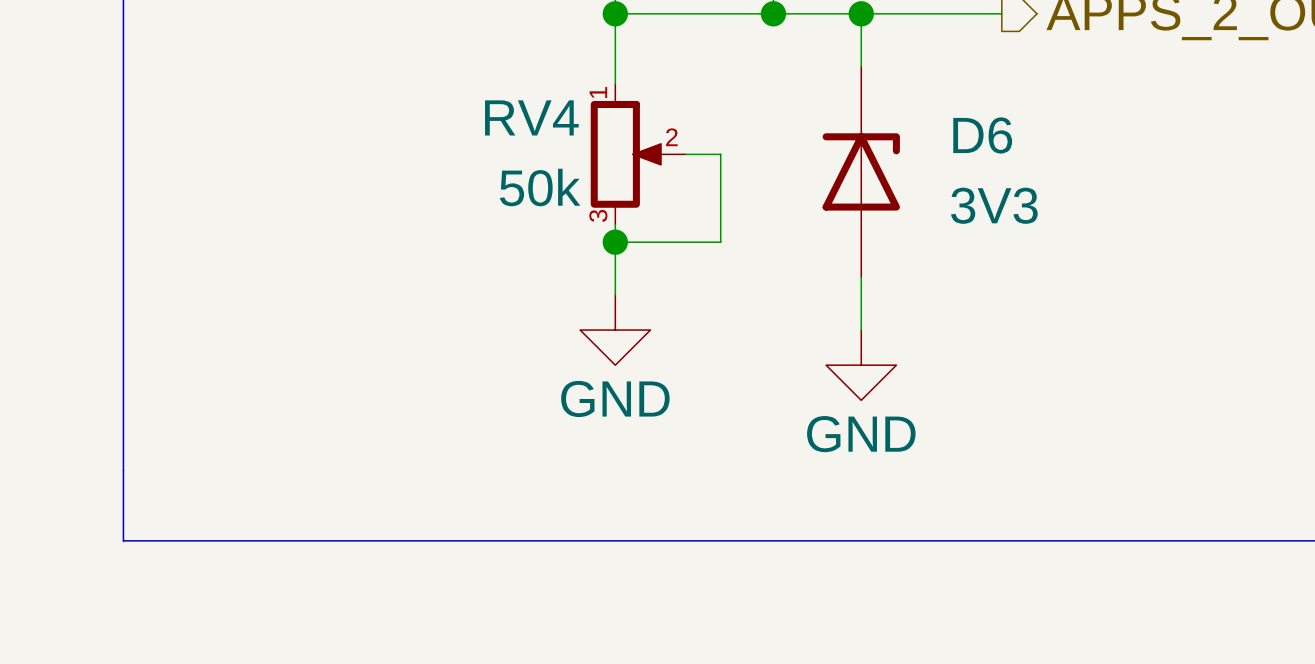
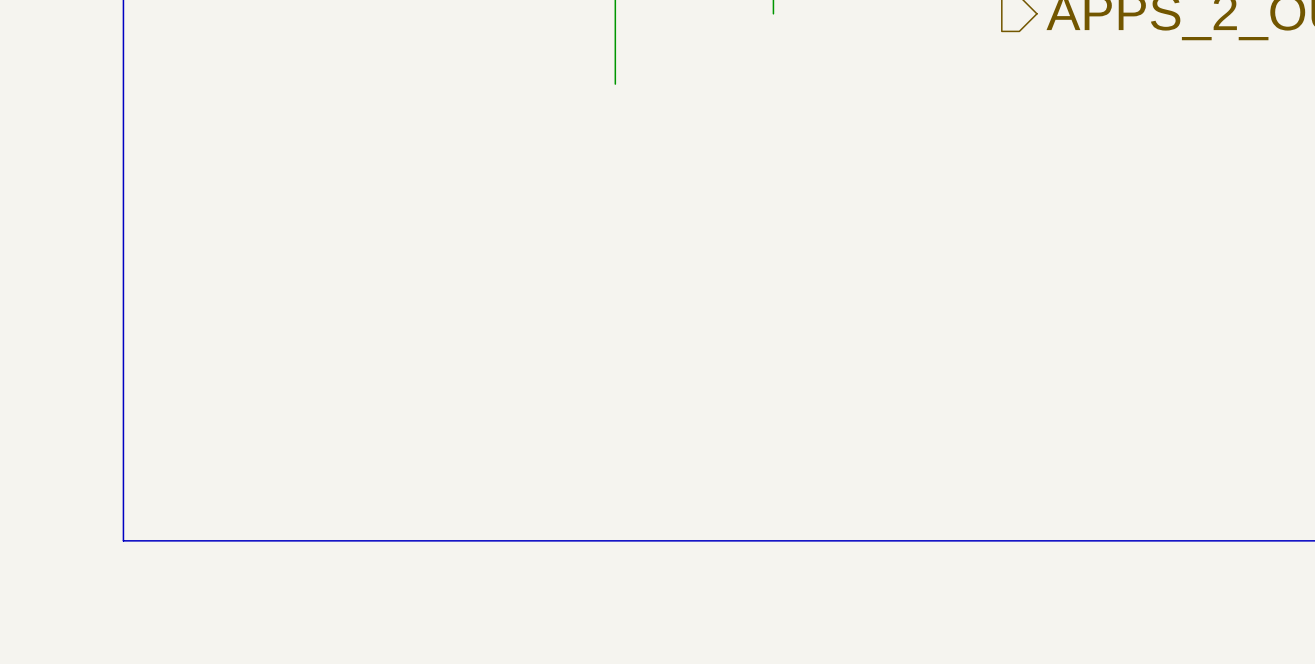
wire: (615, 13) (1001, 13) -> none
junction: (615, 13) -> none
junction: (773, 13) -> none
wire: (861, 13) (861, 66) -> none
junction: (861, 13) -> none
RV4: 50k (638, 154) -> none
wire: (685, 154) (720, 154) (720, 242) (615, 242) -> none
D6: 3V3 (861, 171) -> none
wire: (615, 224) (615, 294) -> none
junction: (615, 242) -> none
wire: (861, 277) (861, 330) -> none
power symbol: GND (615, 330) -> none
power symbol: GND (861, 365) -> none

